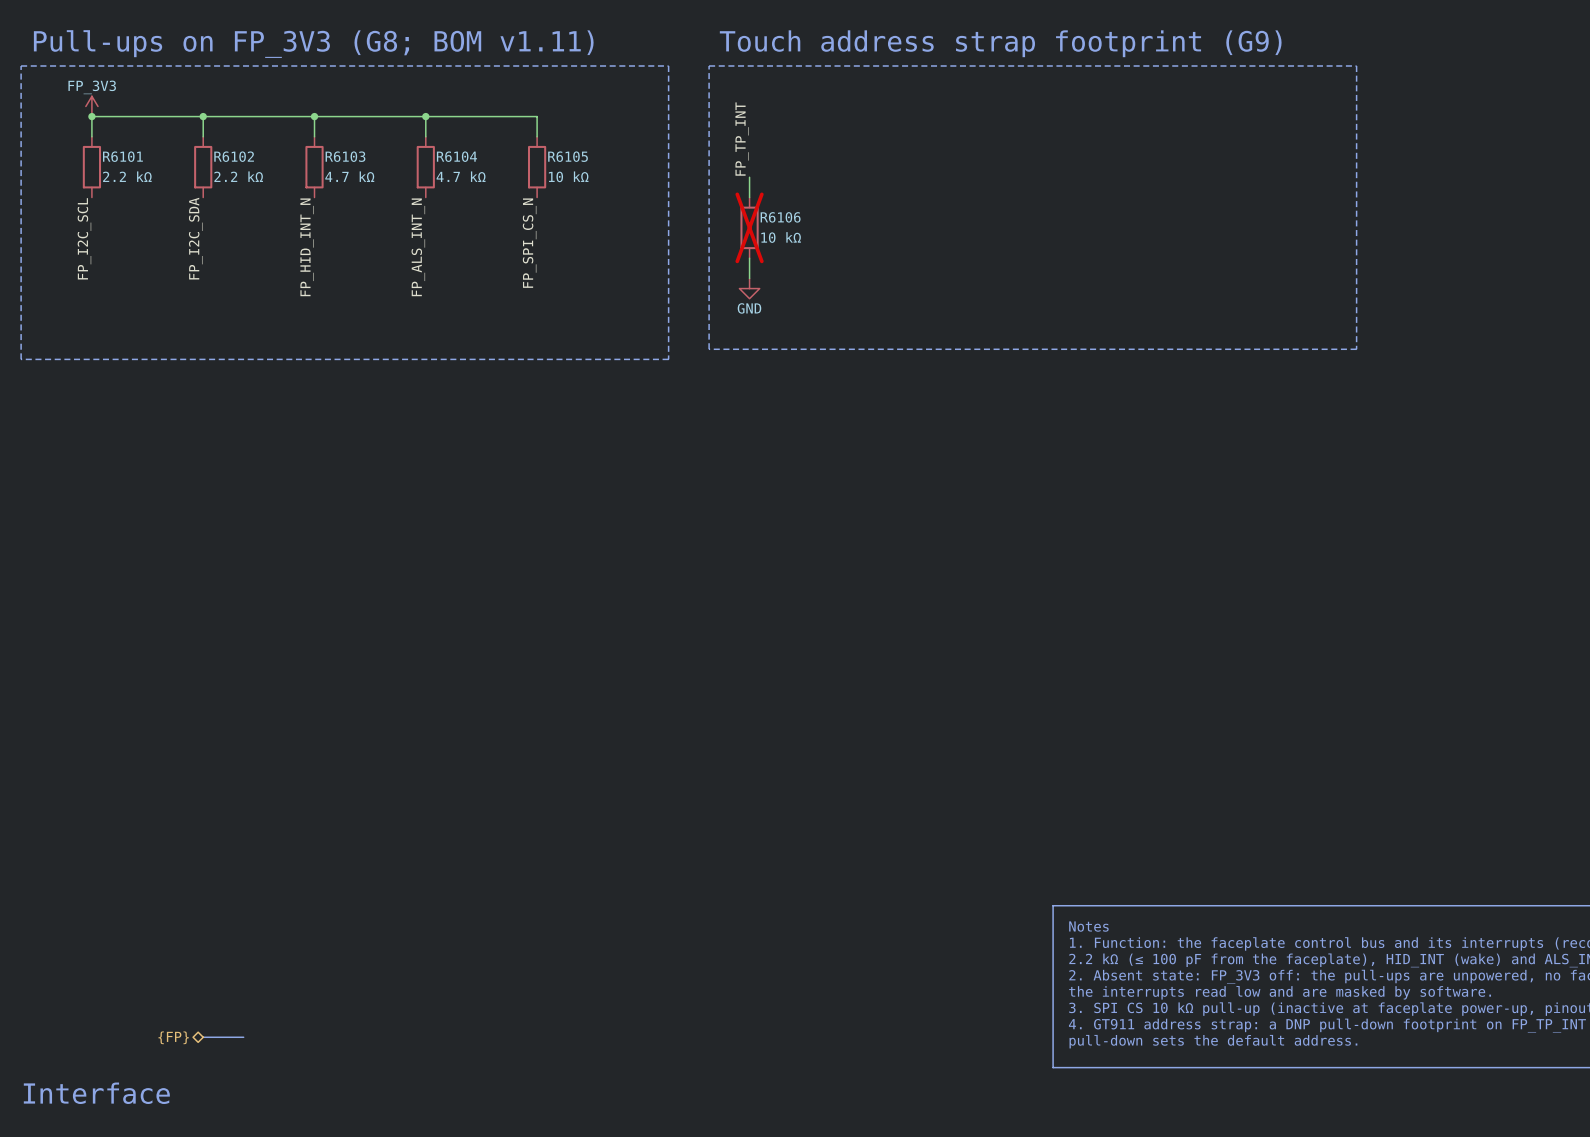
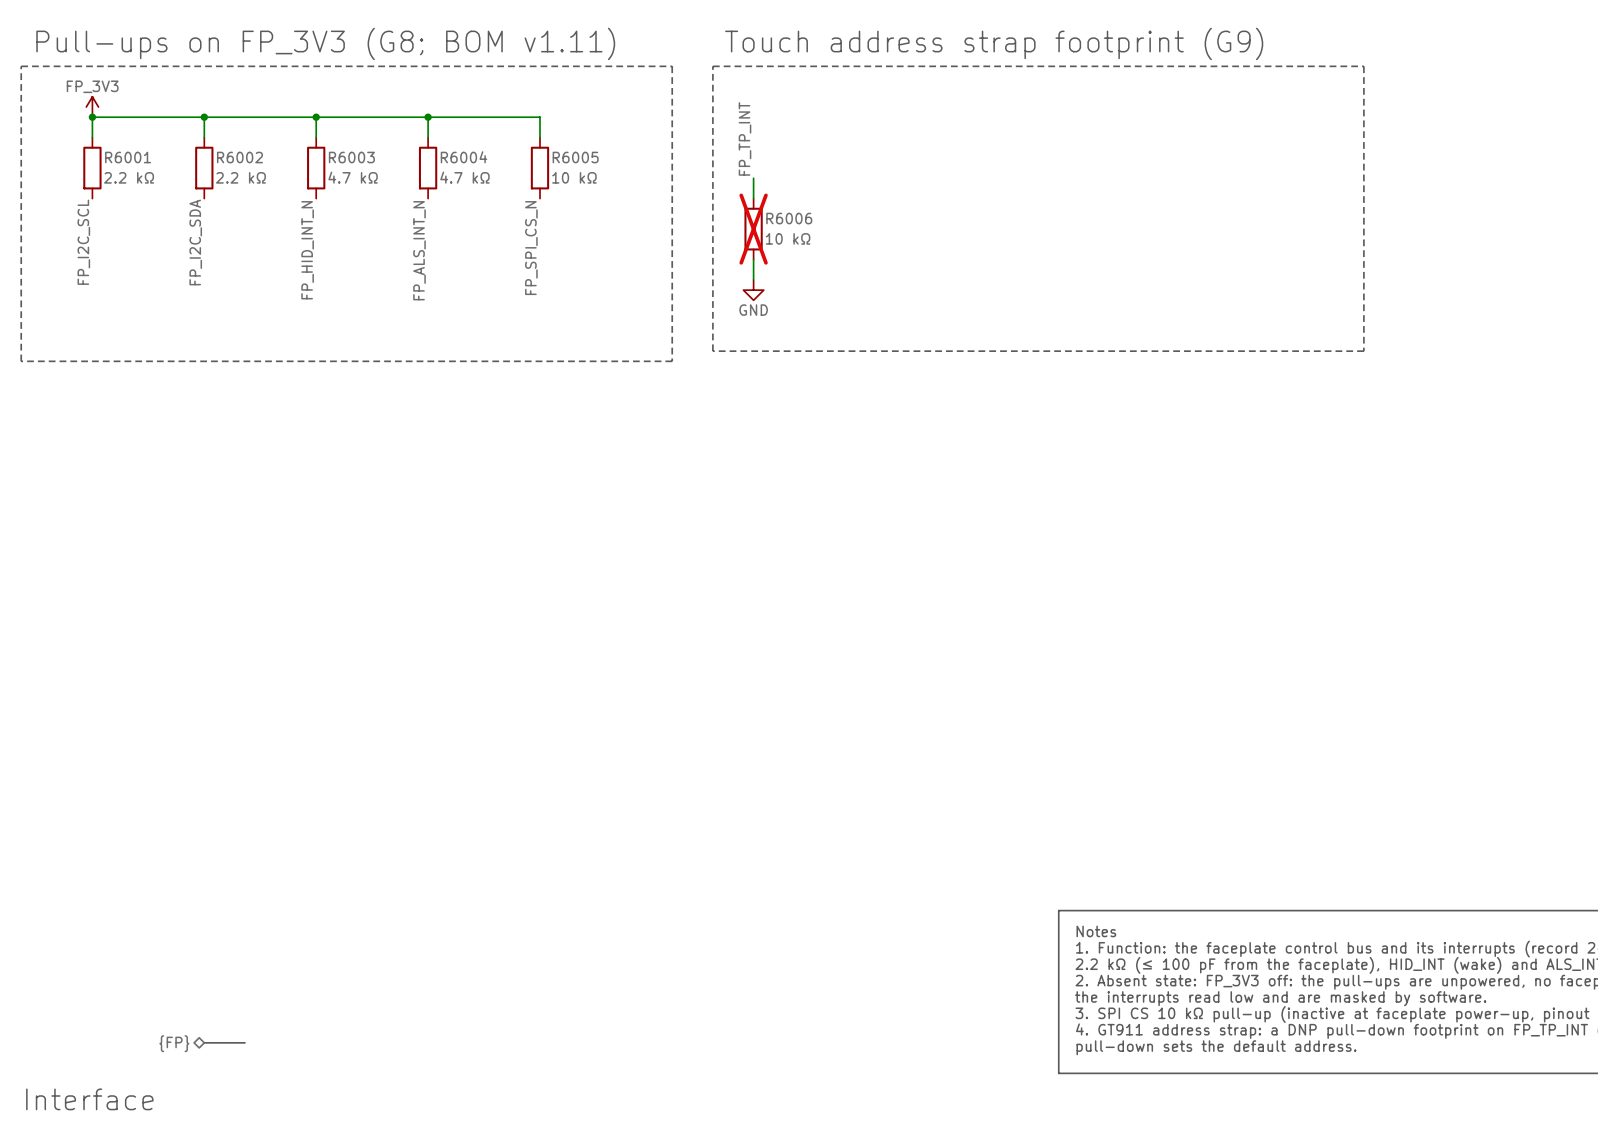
R6101 name: R6101 (122, 156) -> R6001 (128, 157)
R6102 name: R6102 (234, 156) -> R6002 (239, 157)
R6103 name: R6103 (345, 156) -> R6003 (351, 157)
R6104 name: R6104 (456, 156) -> R6004 (464, 157)
R6105 name: R6105 (568, 156) -> R6005 (575, 157)
R6106 name: R6106 (780, 217) -> R6006 (789, 218)

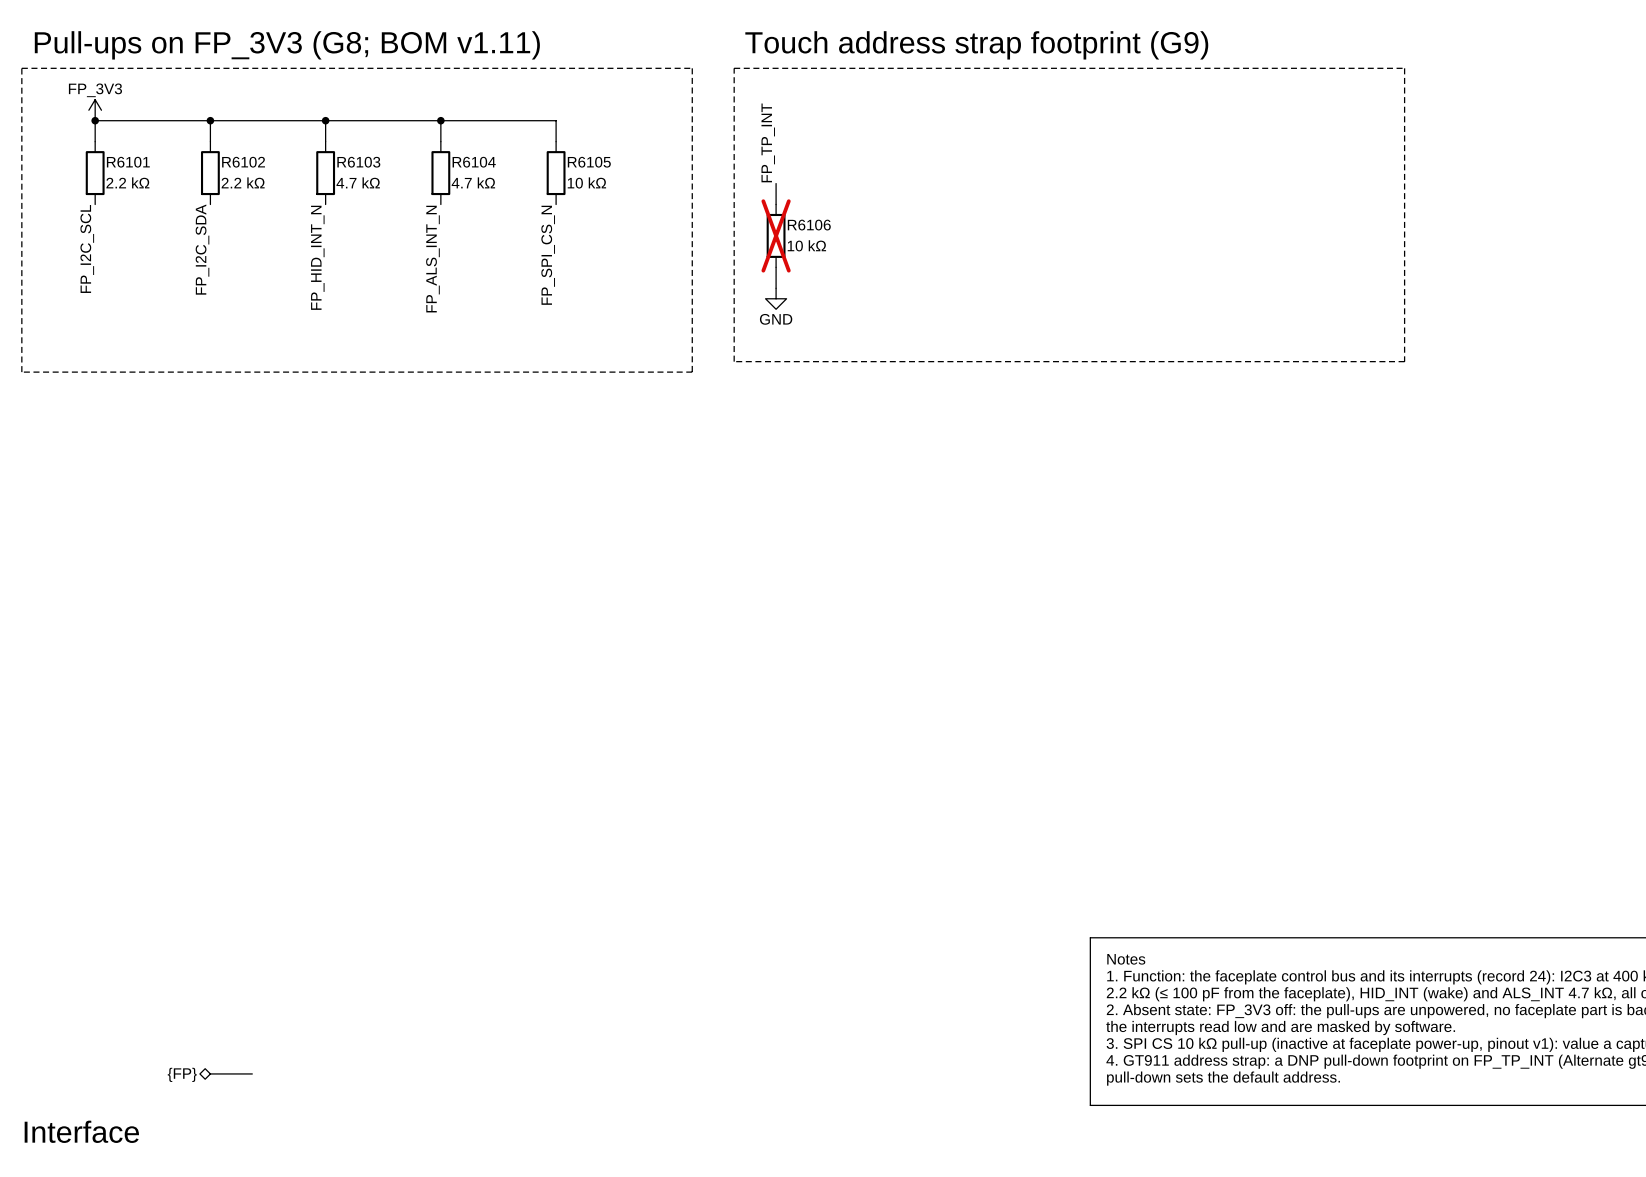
R6001 name: R6001 (128, 157) -> R6101 (128, 162)
R6002 name: R6002 (239, 157) -> R6102 (243, 162)
R6003 name: R6003 (351, 157) -> R6103 (358, 162)
R6004 name: R6004 (464, 157) -> R6104 (474, 162)
R6005 name: R6005 (575, 157) -> R6105 (589, 162)
R6006 name: R6006 (789, 218) -> R6106 (809, 225)

